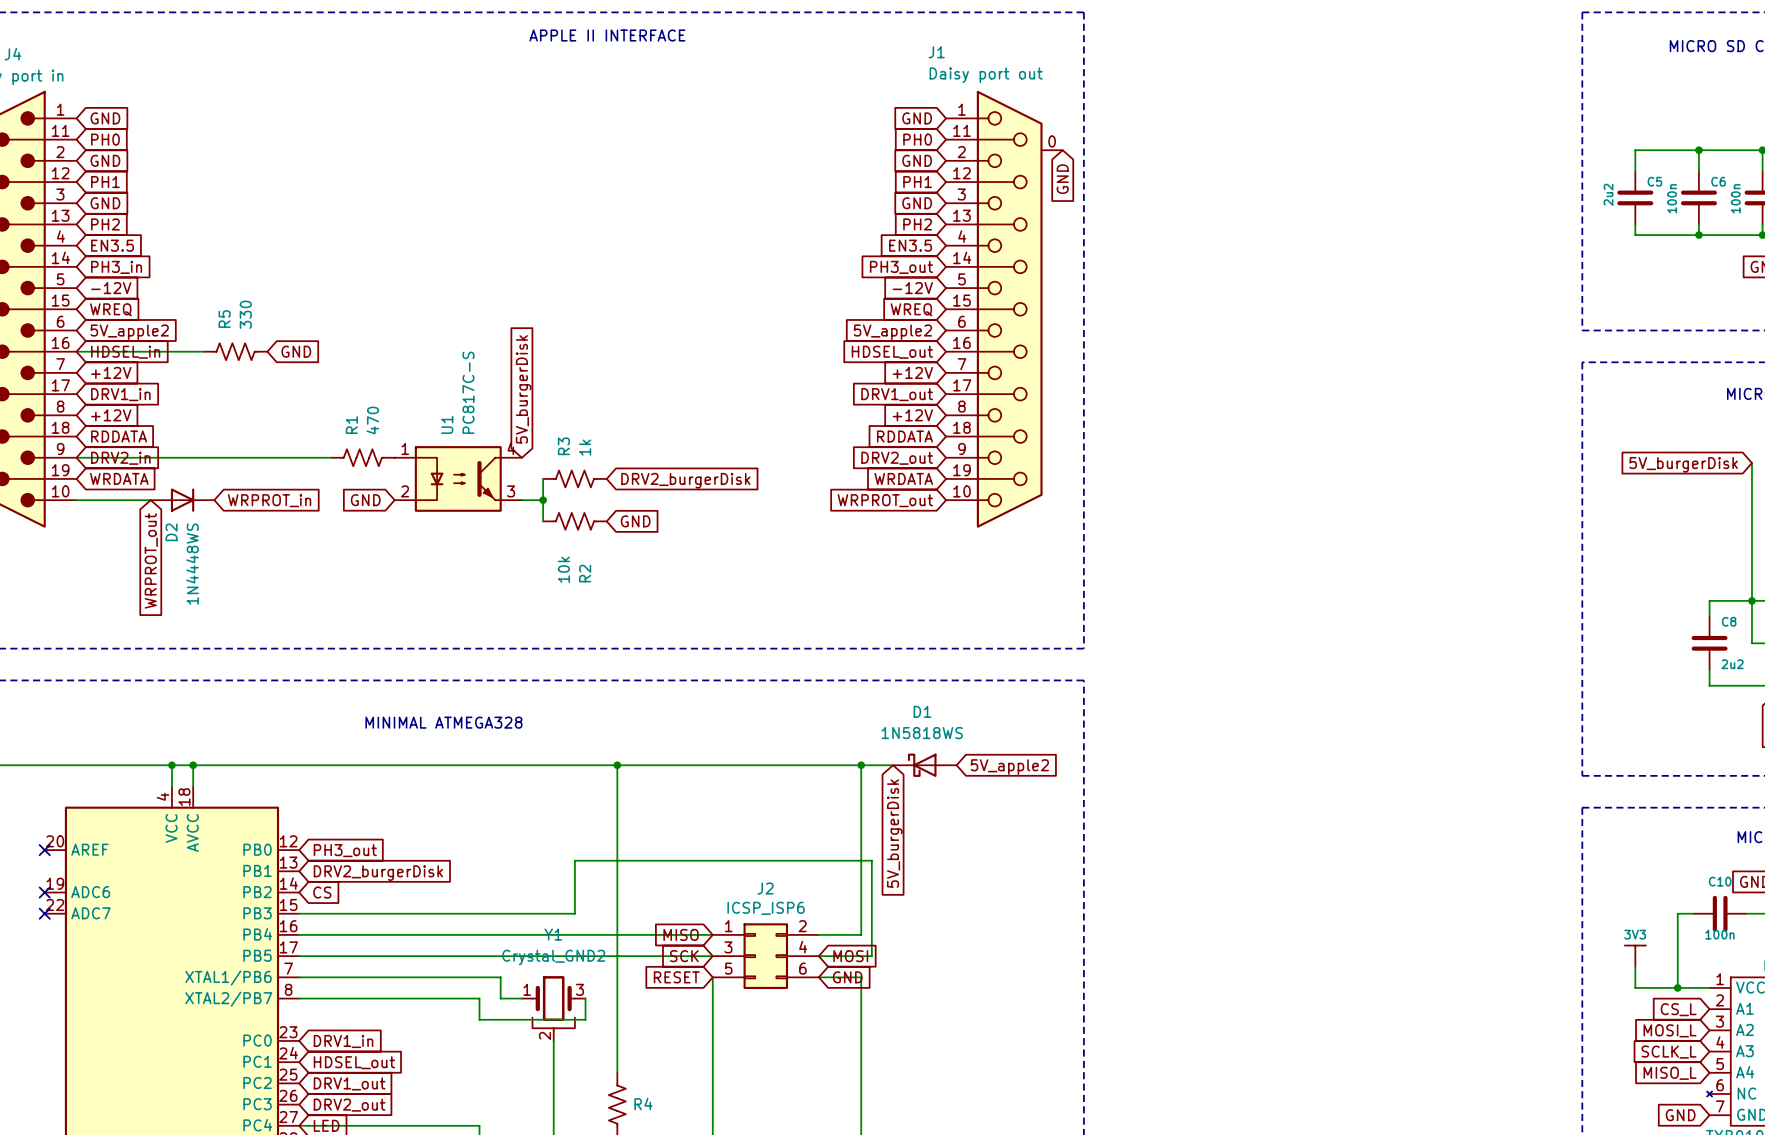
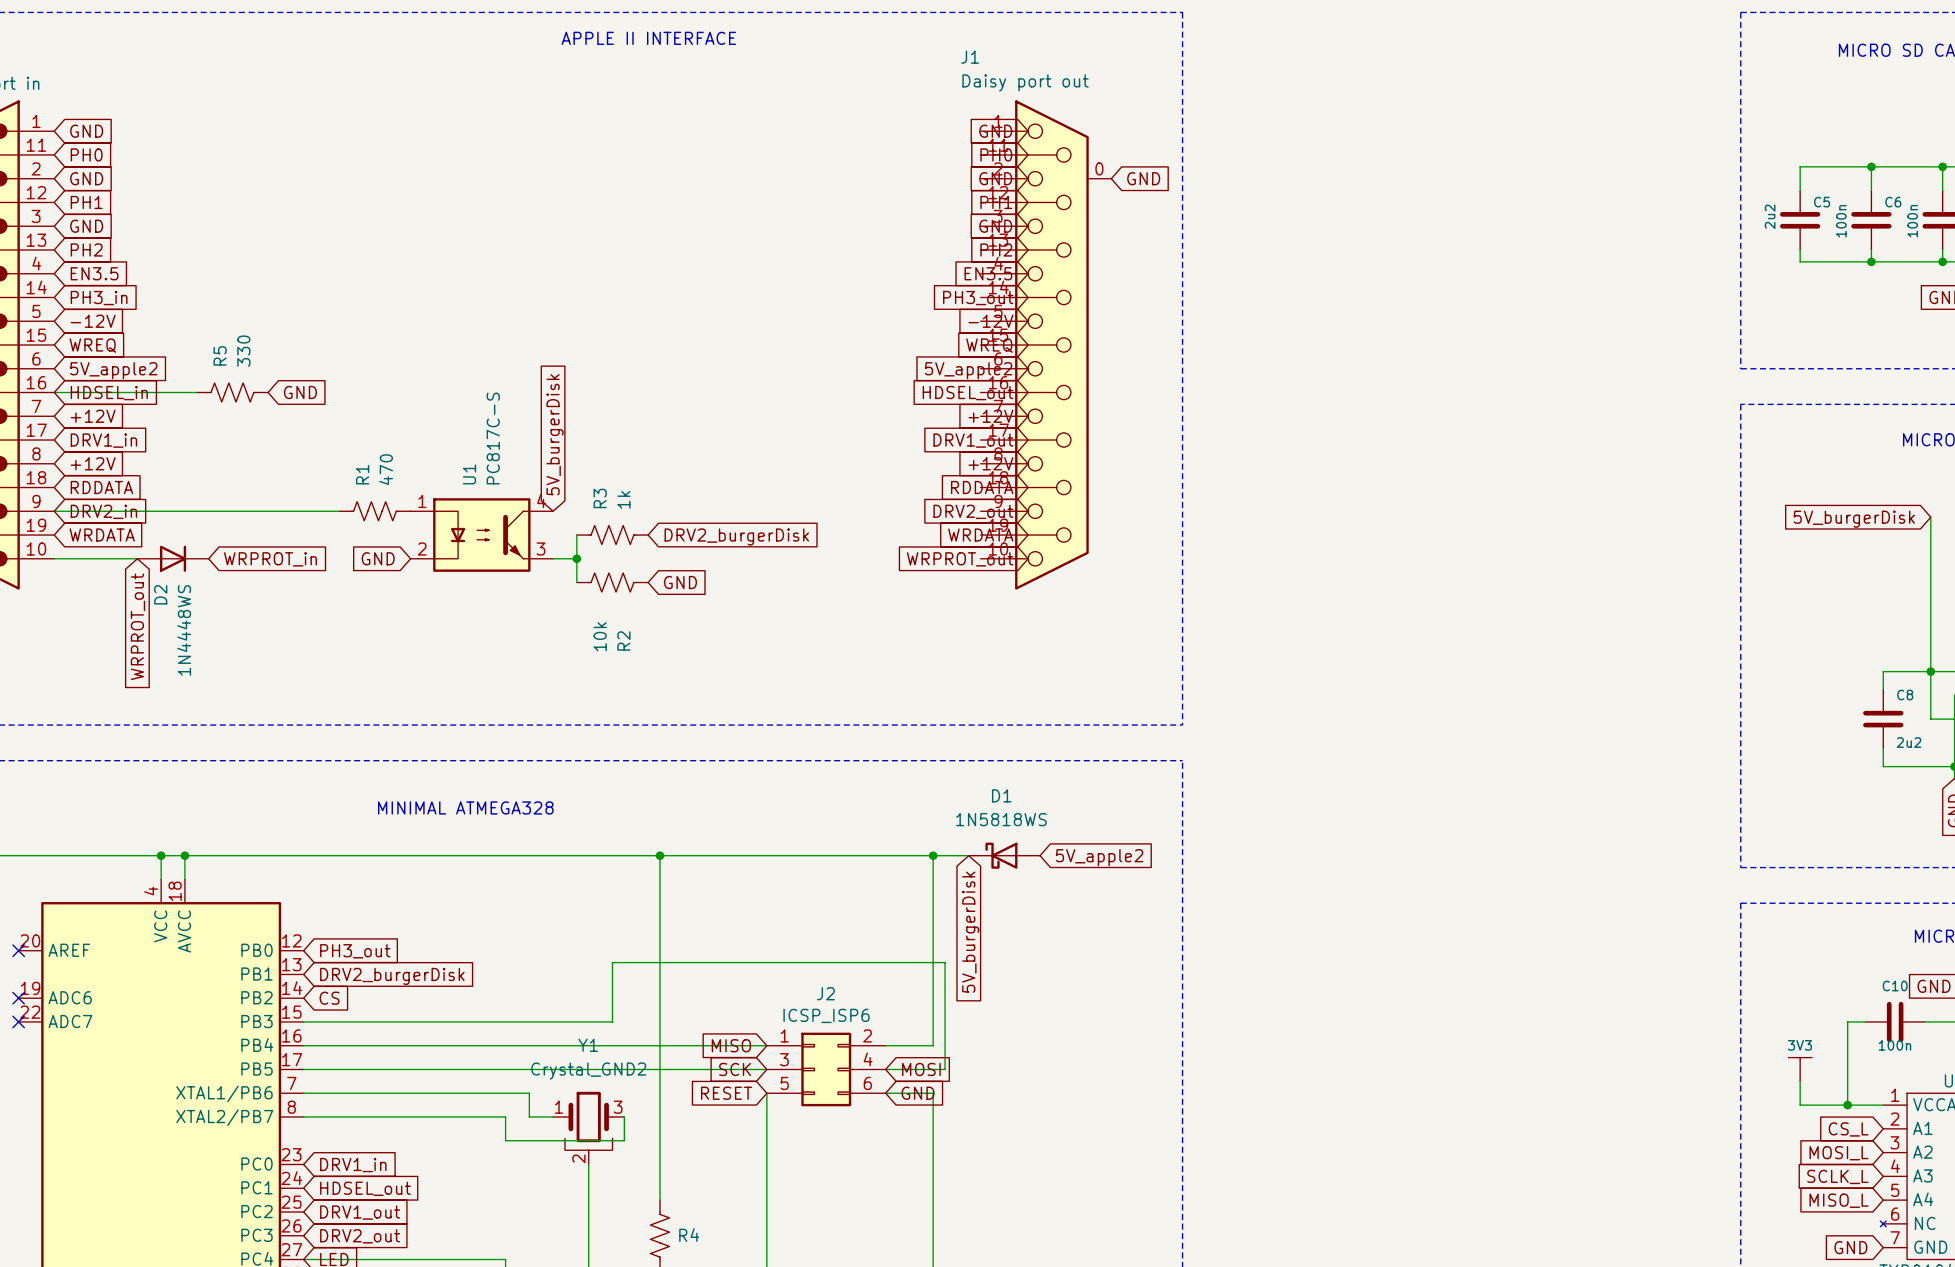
J1 symbol: [946, 90, 1063, 528] -> [980, 100, 1112, 590]
global label rotation: 0° (1062, 179) -> 90° counterclockwise (1143, 178)

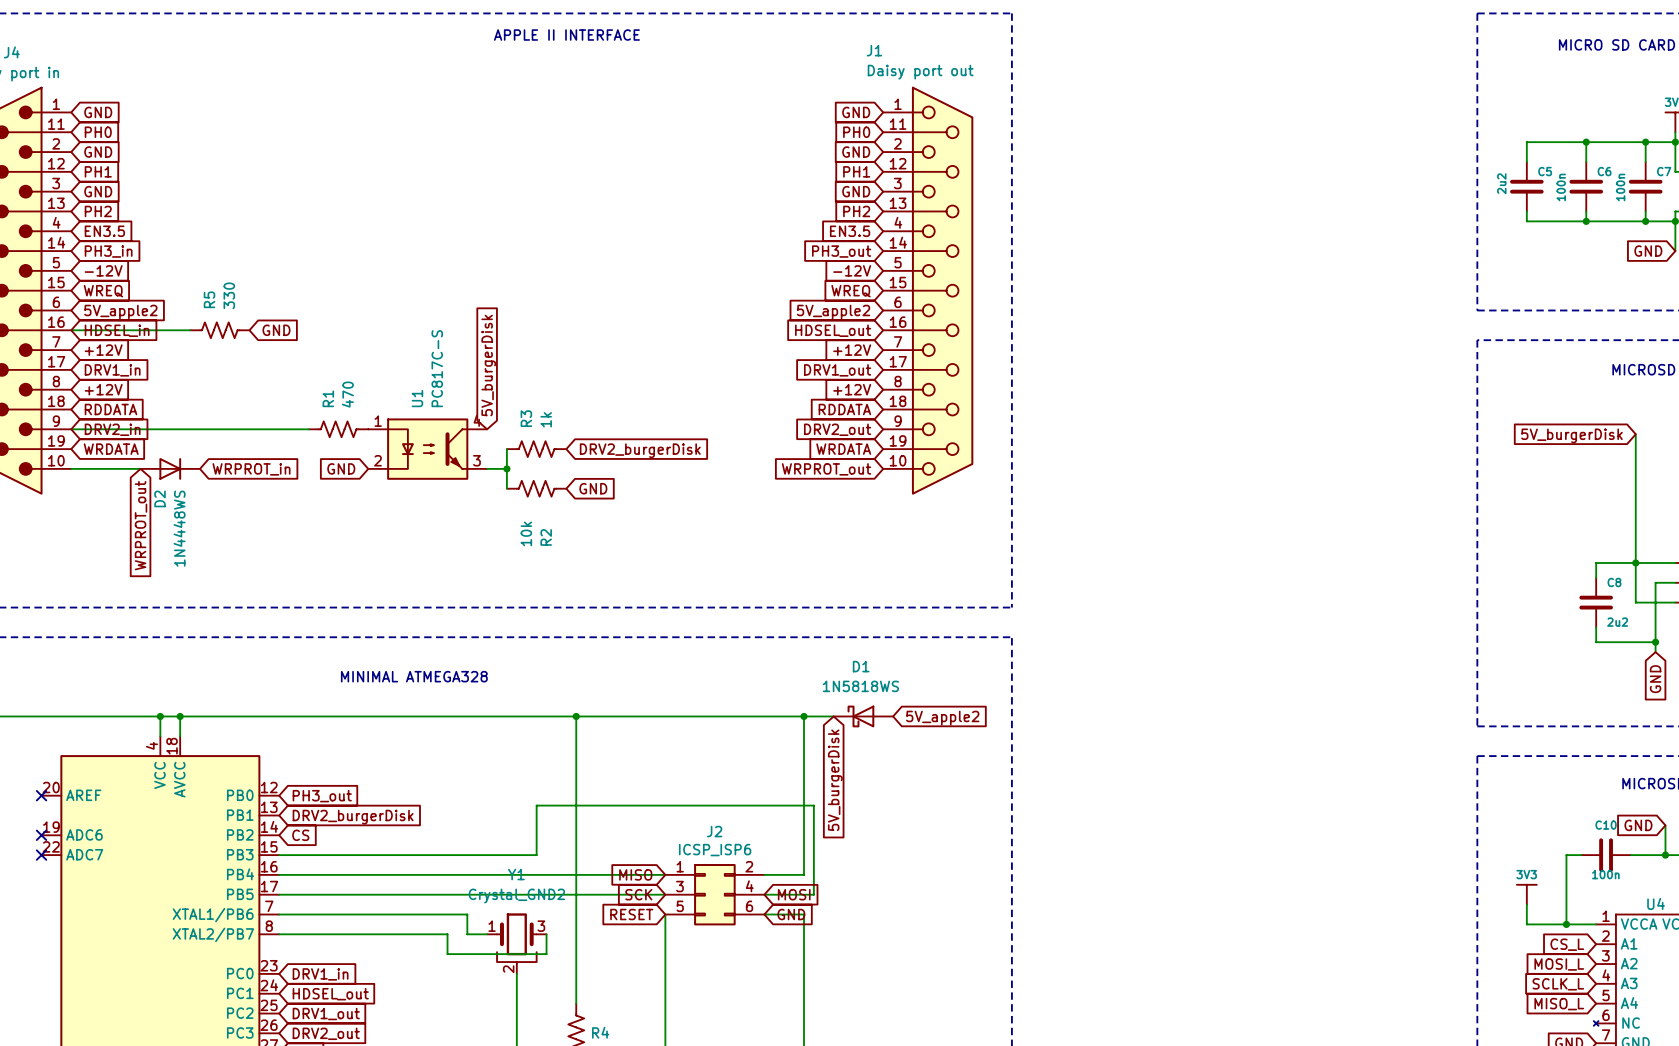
J1 symbol: [980, 100, 1112, 590] -> [883, 86, 974, 495]
global label: GND (1143, 178) -> none

